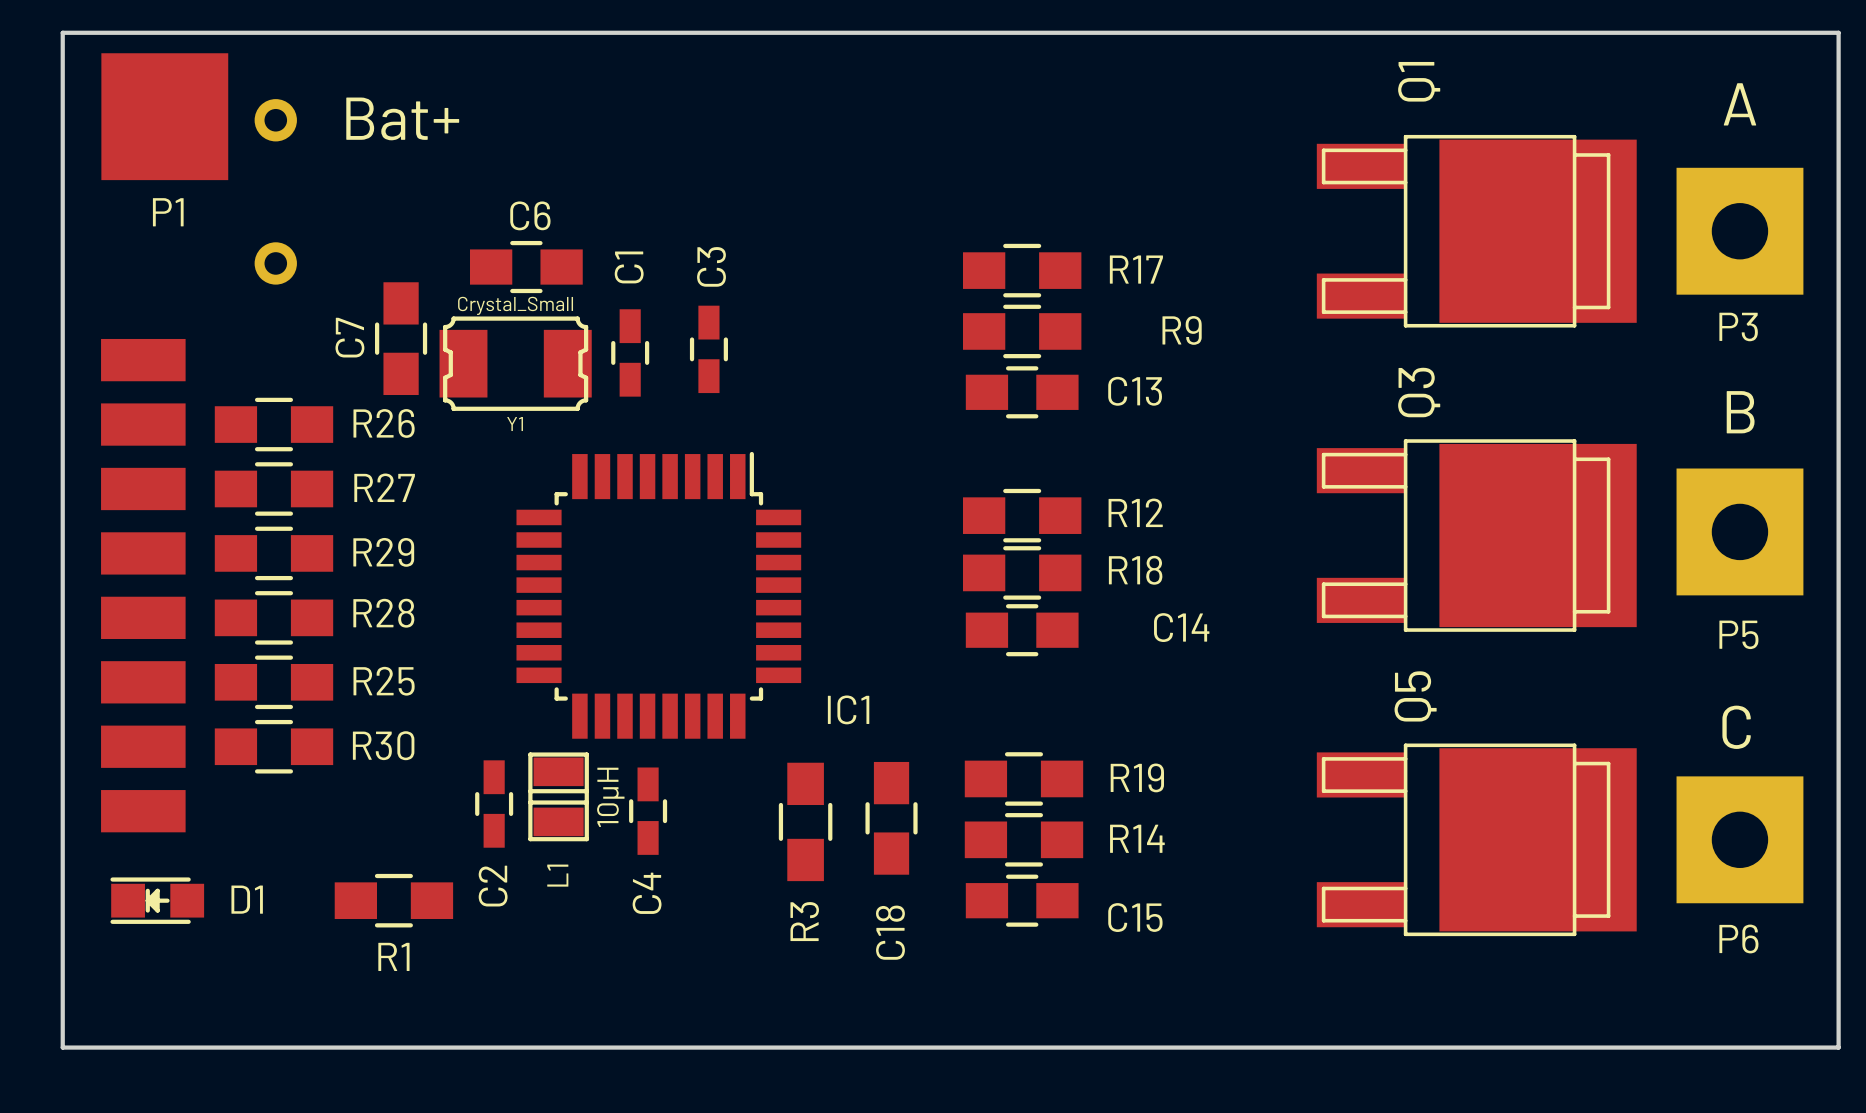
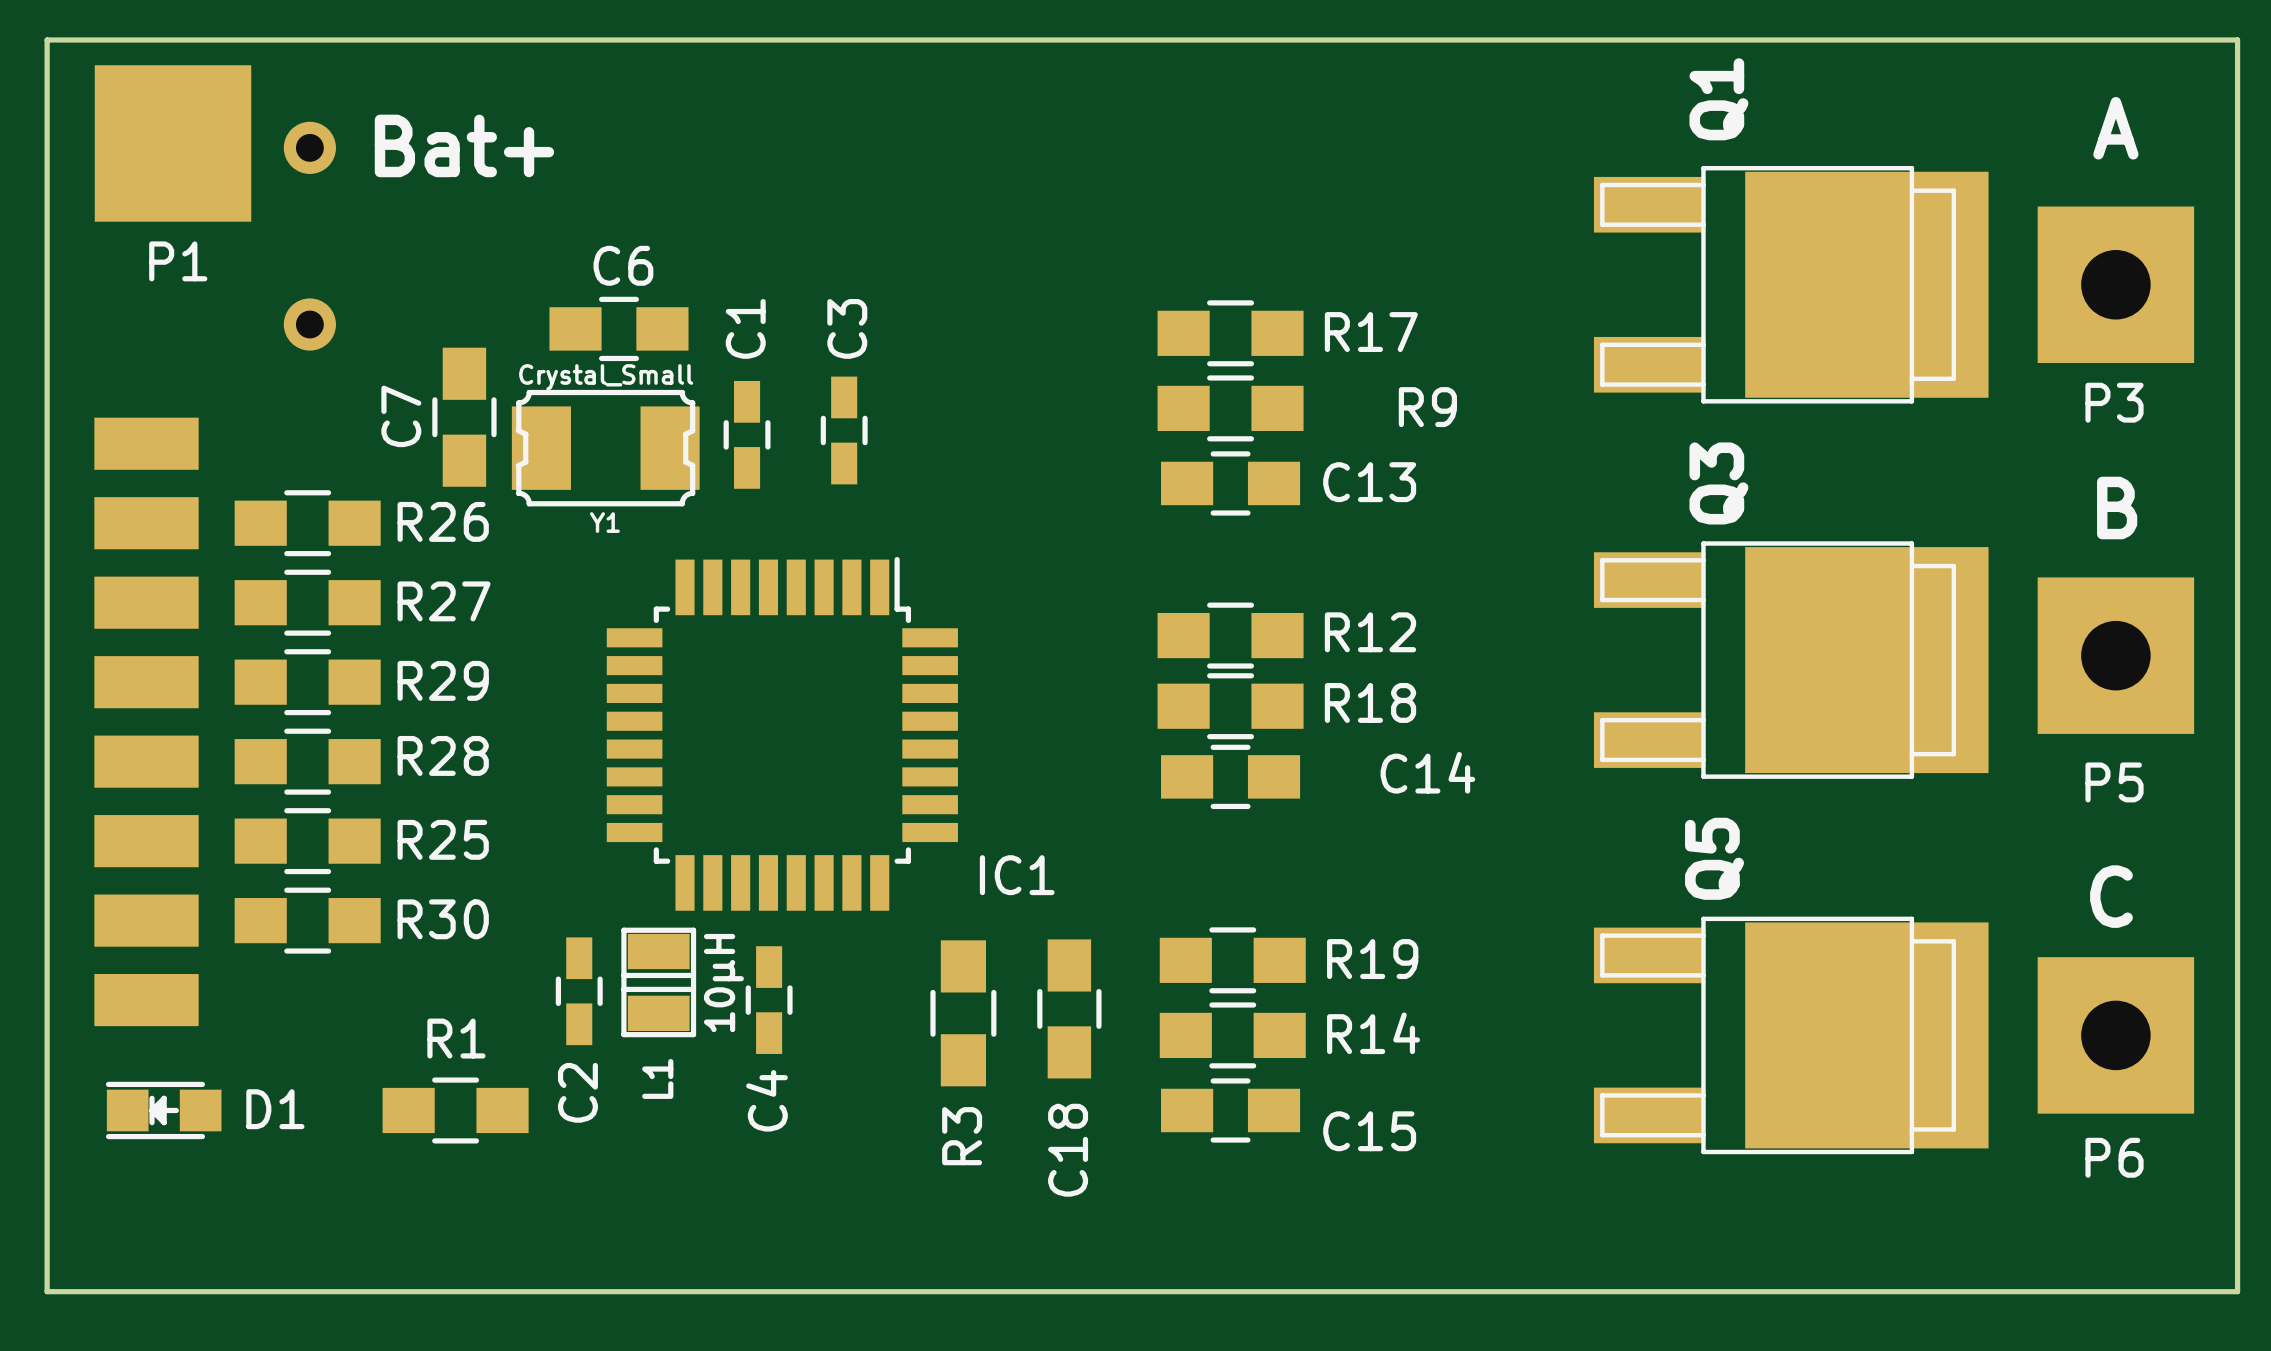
R1 name position: R1 (393, 956) -> R1 (456, 1038)

